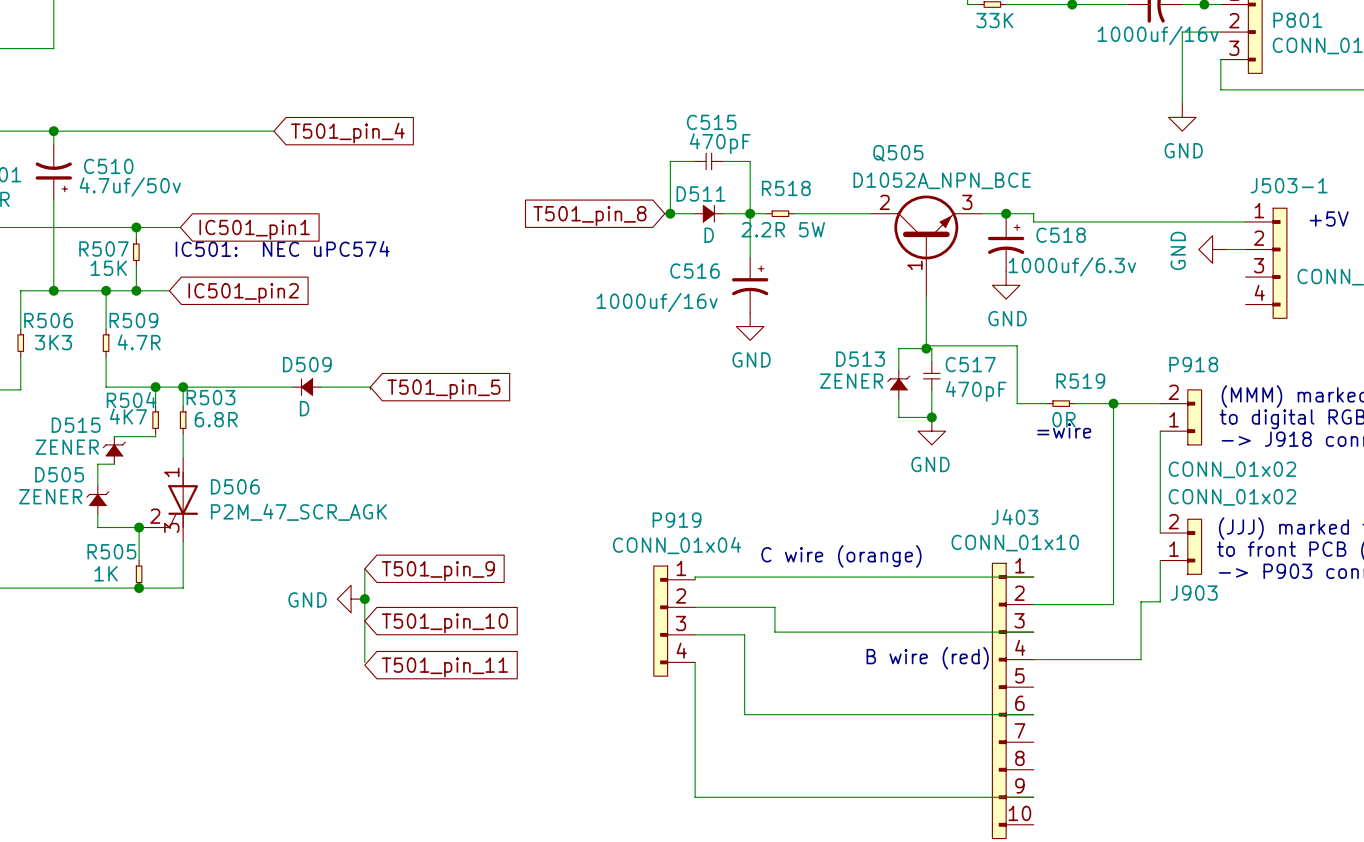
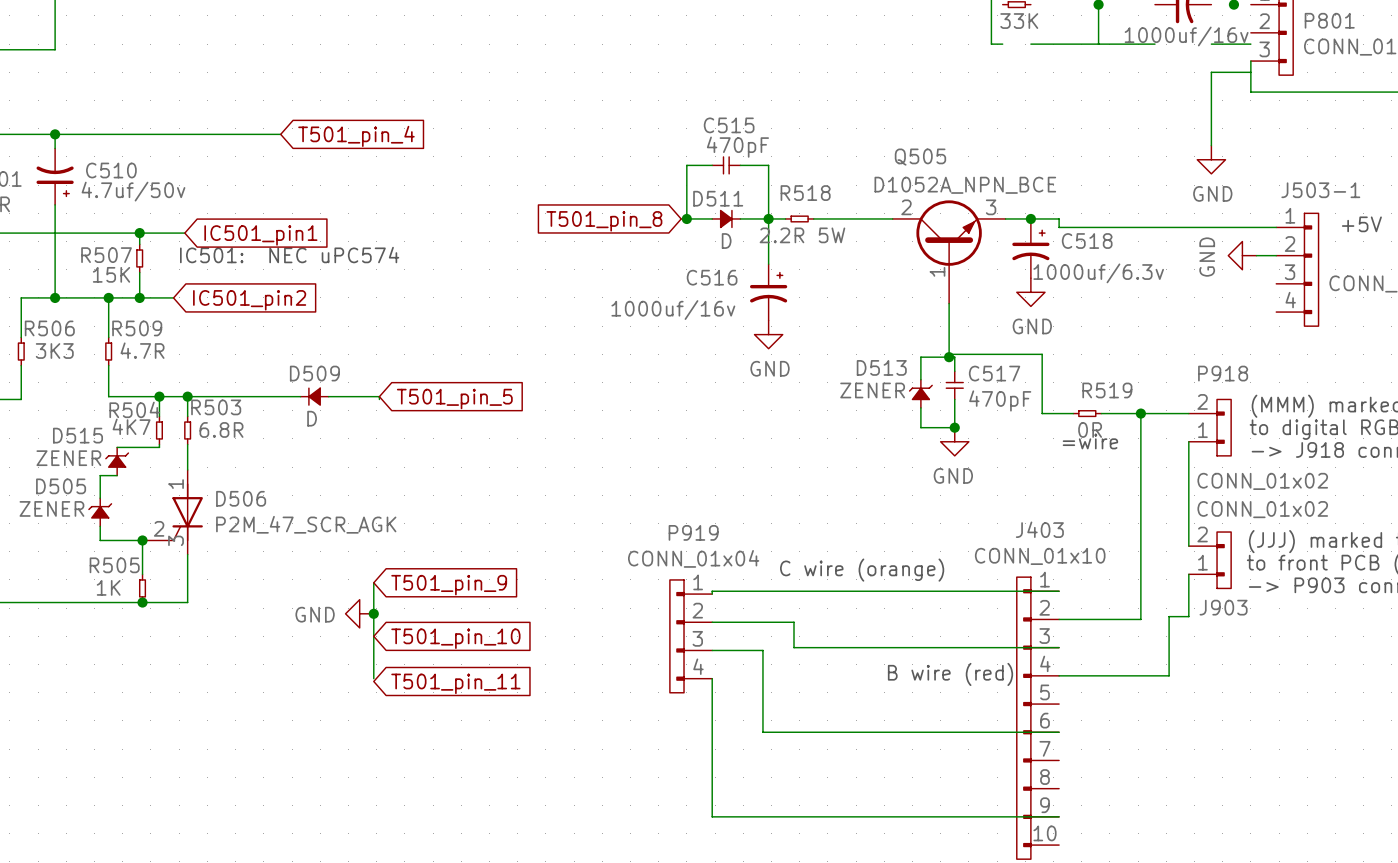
wire: (967, 4) (978, 4) -> (991, 4) (991, 44) (1002, 44)
wire: (1006, 4) (1127, 4) -> (1030, 44) (1154, 44)
wire: none -> (1098, 4) (1098, 44)
wire: (1182, 4) (1220, 4) -> (1211, 44) (1250, 44)
wire: (1220, 32) (1182, 32) (1182, 70) -> (1250, 72) (1211, 72)
wire: none -> (1211, 106) (1211, 145)
power symbol position: GND (1182, 117) -> GND (1211, 159)

